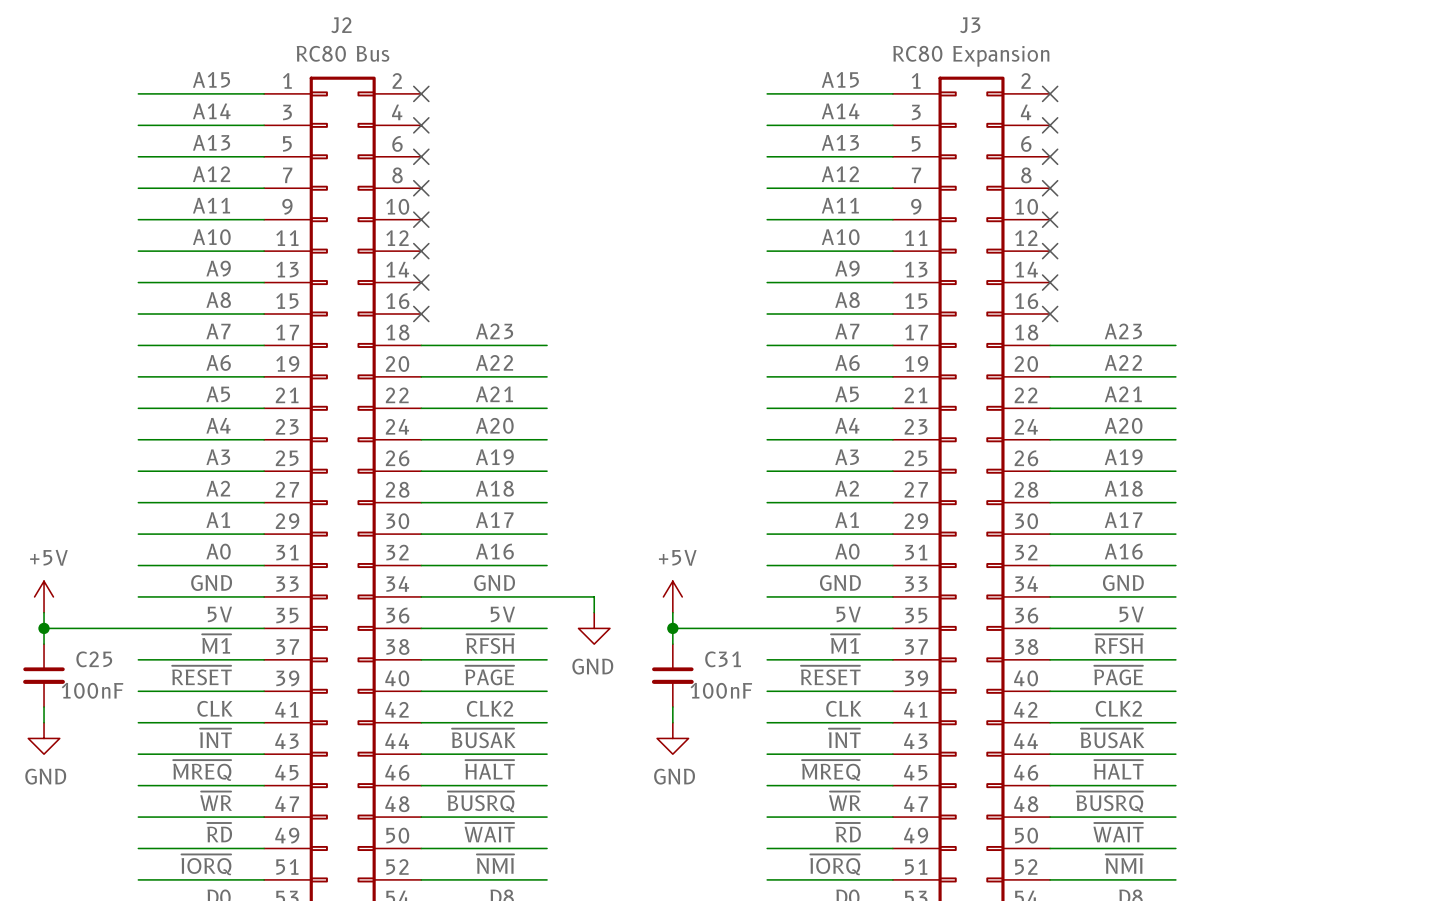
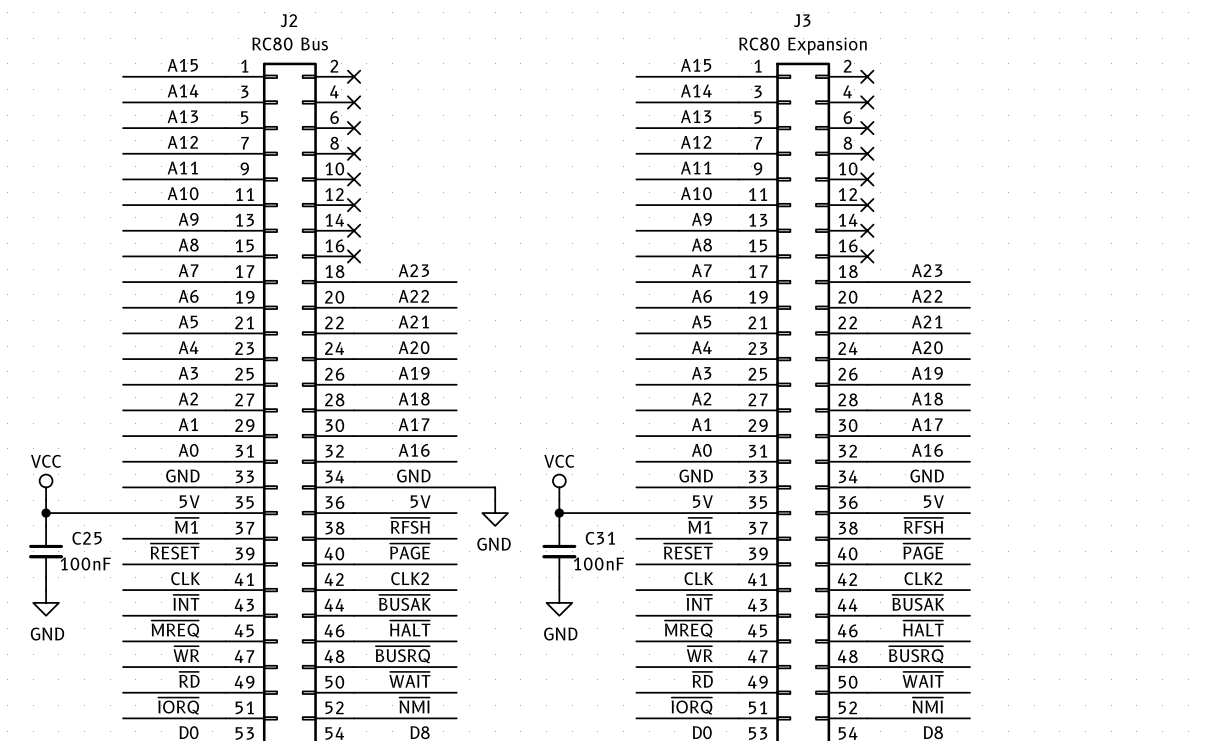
power symbol: +5V (44, 596) -> VCC (46, 487)
power symbol: +5V (672, 596) -> VCC (559, 487)

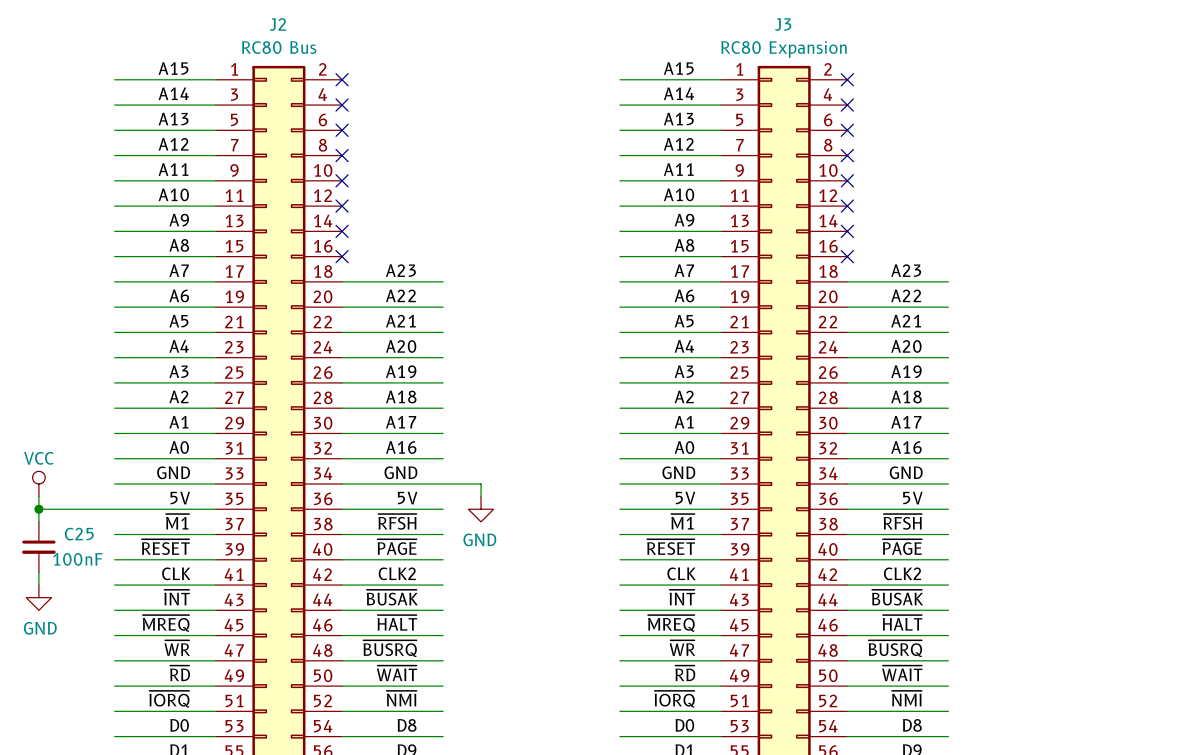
power symbol: VCC (559, 487) -> none
wire: (559, 500) (559, 525) -> none
wire: (559, 513) (636, 513) -> none
junction: (559, 513) -> none
C31: 100nF (559, 551) -> none
wire: (559, 577) (559, 590) -> none
power symbol: GND (559, 602) -> none

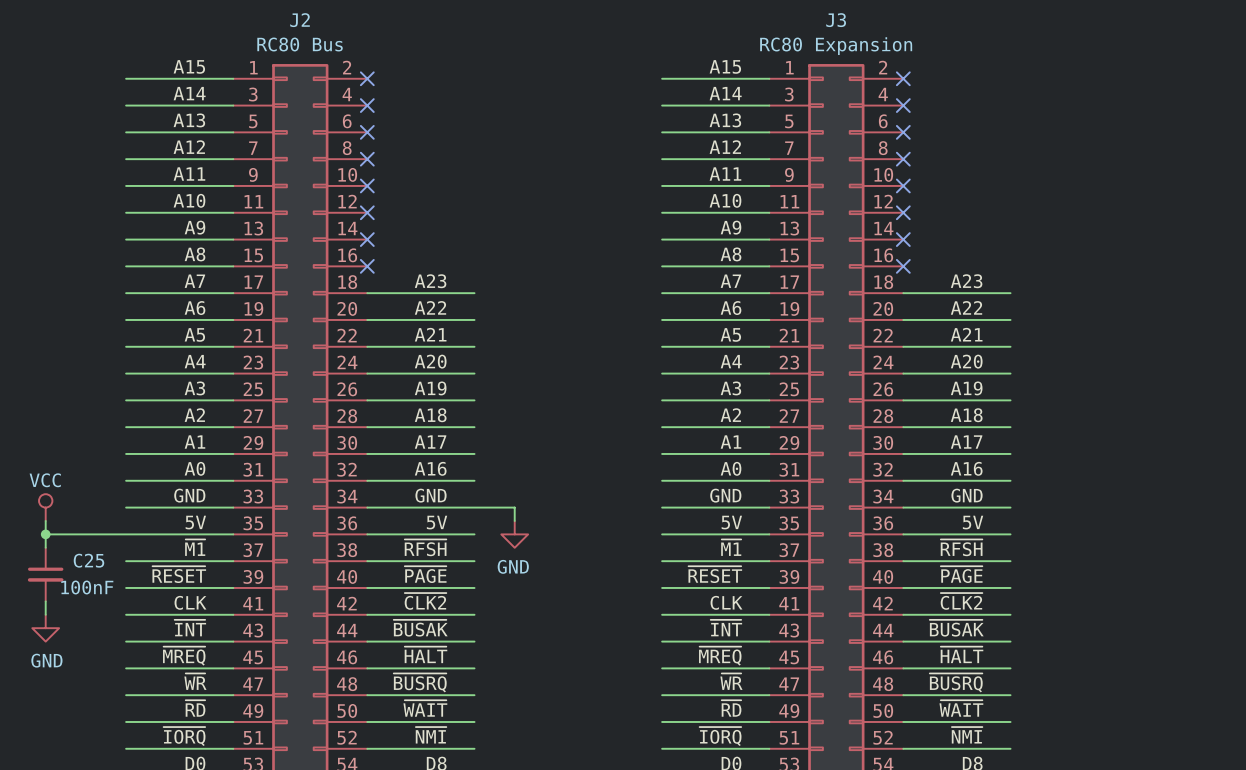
label: CLK2 (397, 573) -> ~{CLK2} (425, 601)
label: CLK2 (902, 573) -> ~{CLK2} (961, 601)

